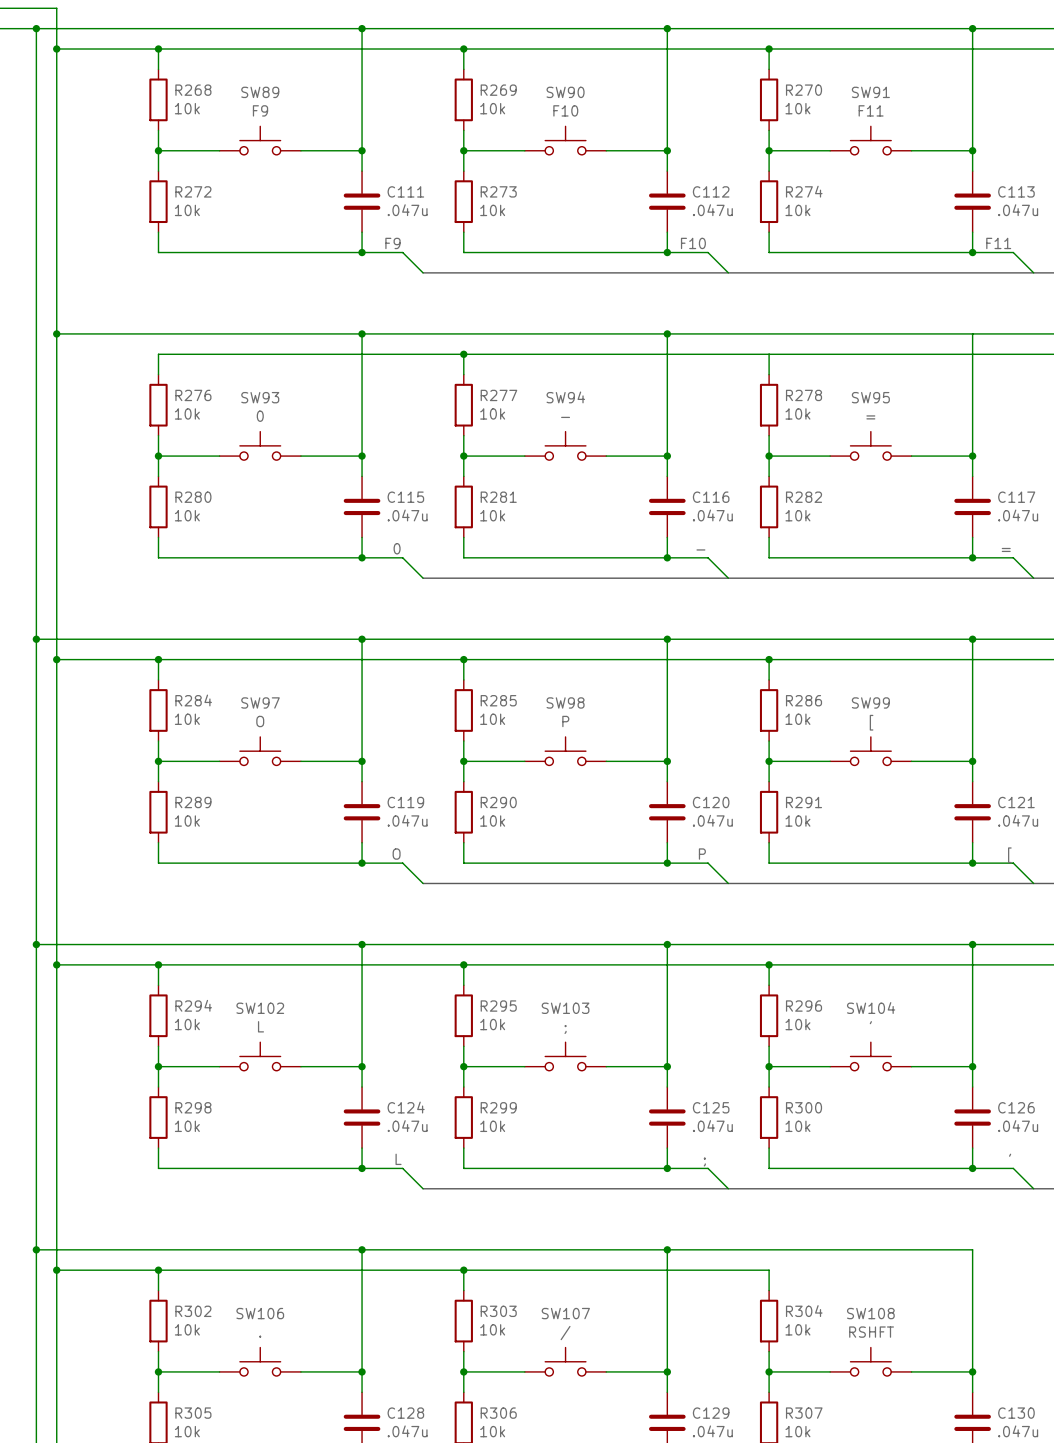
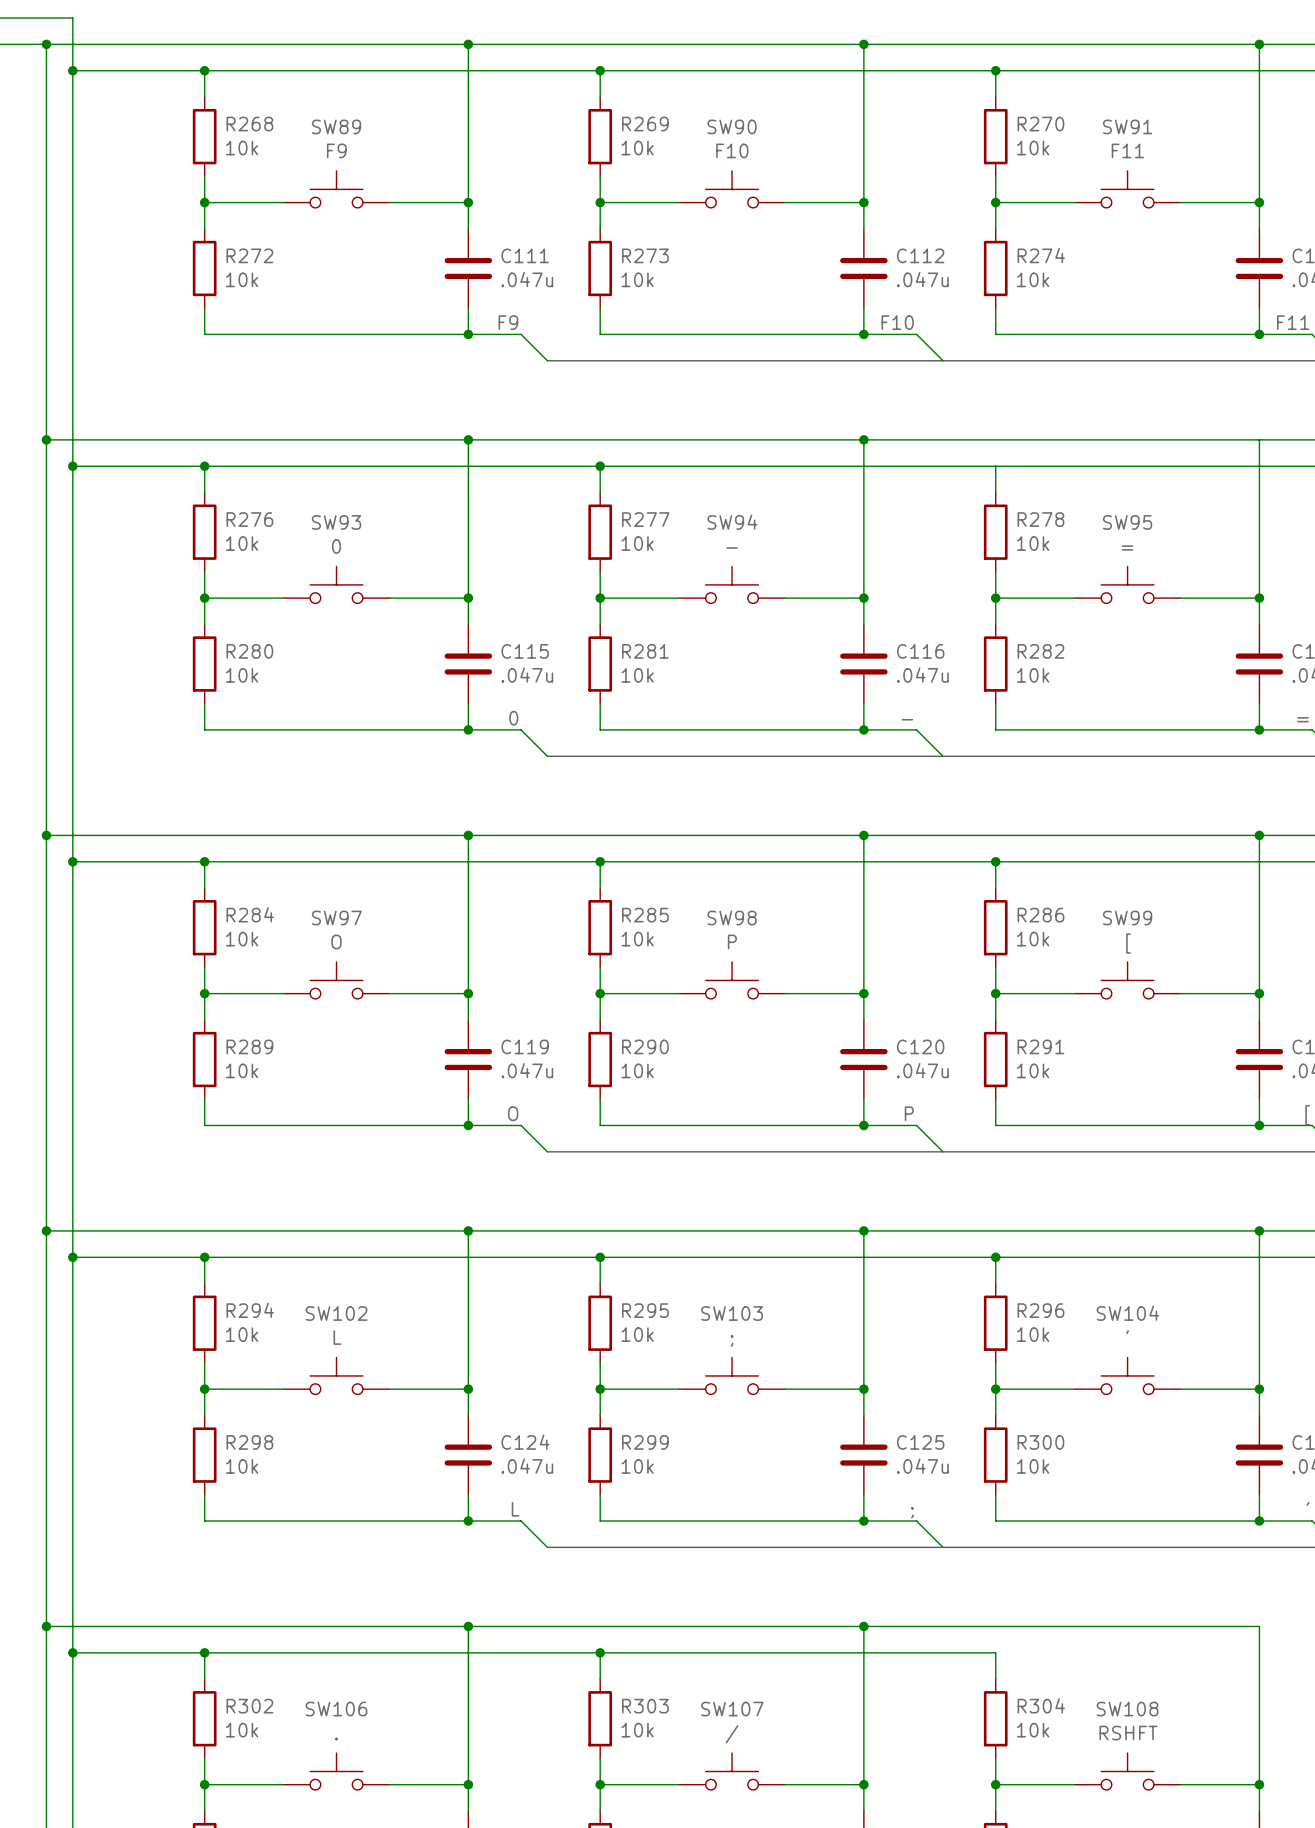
wire: none -> (46, 439) (72, 439)
junction: none -> (46, 439)
junction: (56, 333) -> none
wire: none -> (72, 466) (204, 466)
junction: none -> (72, 466)
junction: none -> (204, 466)

